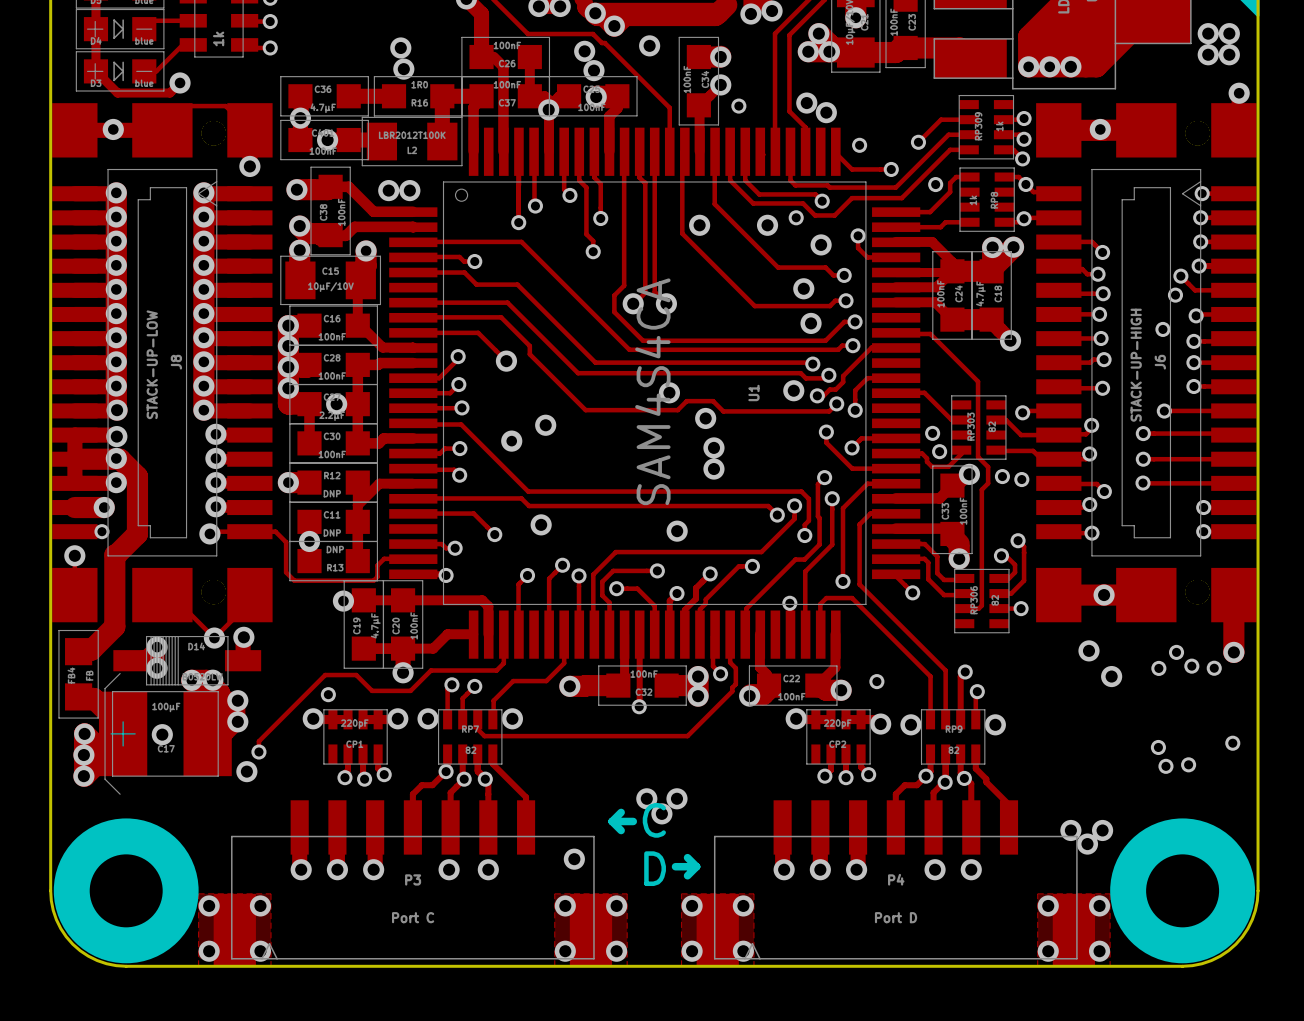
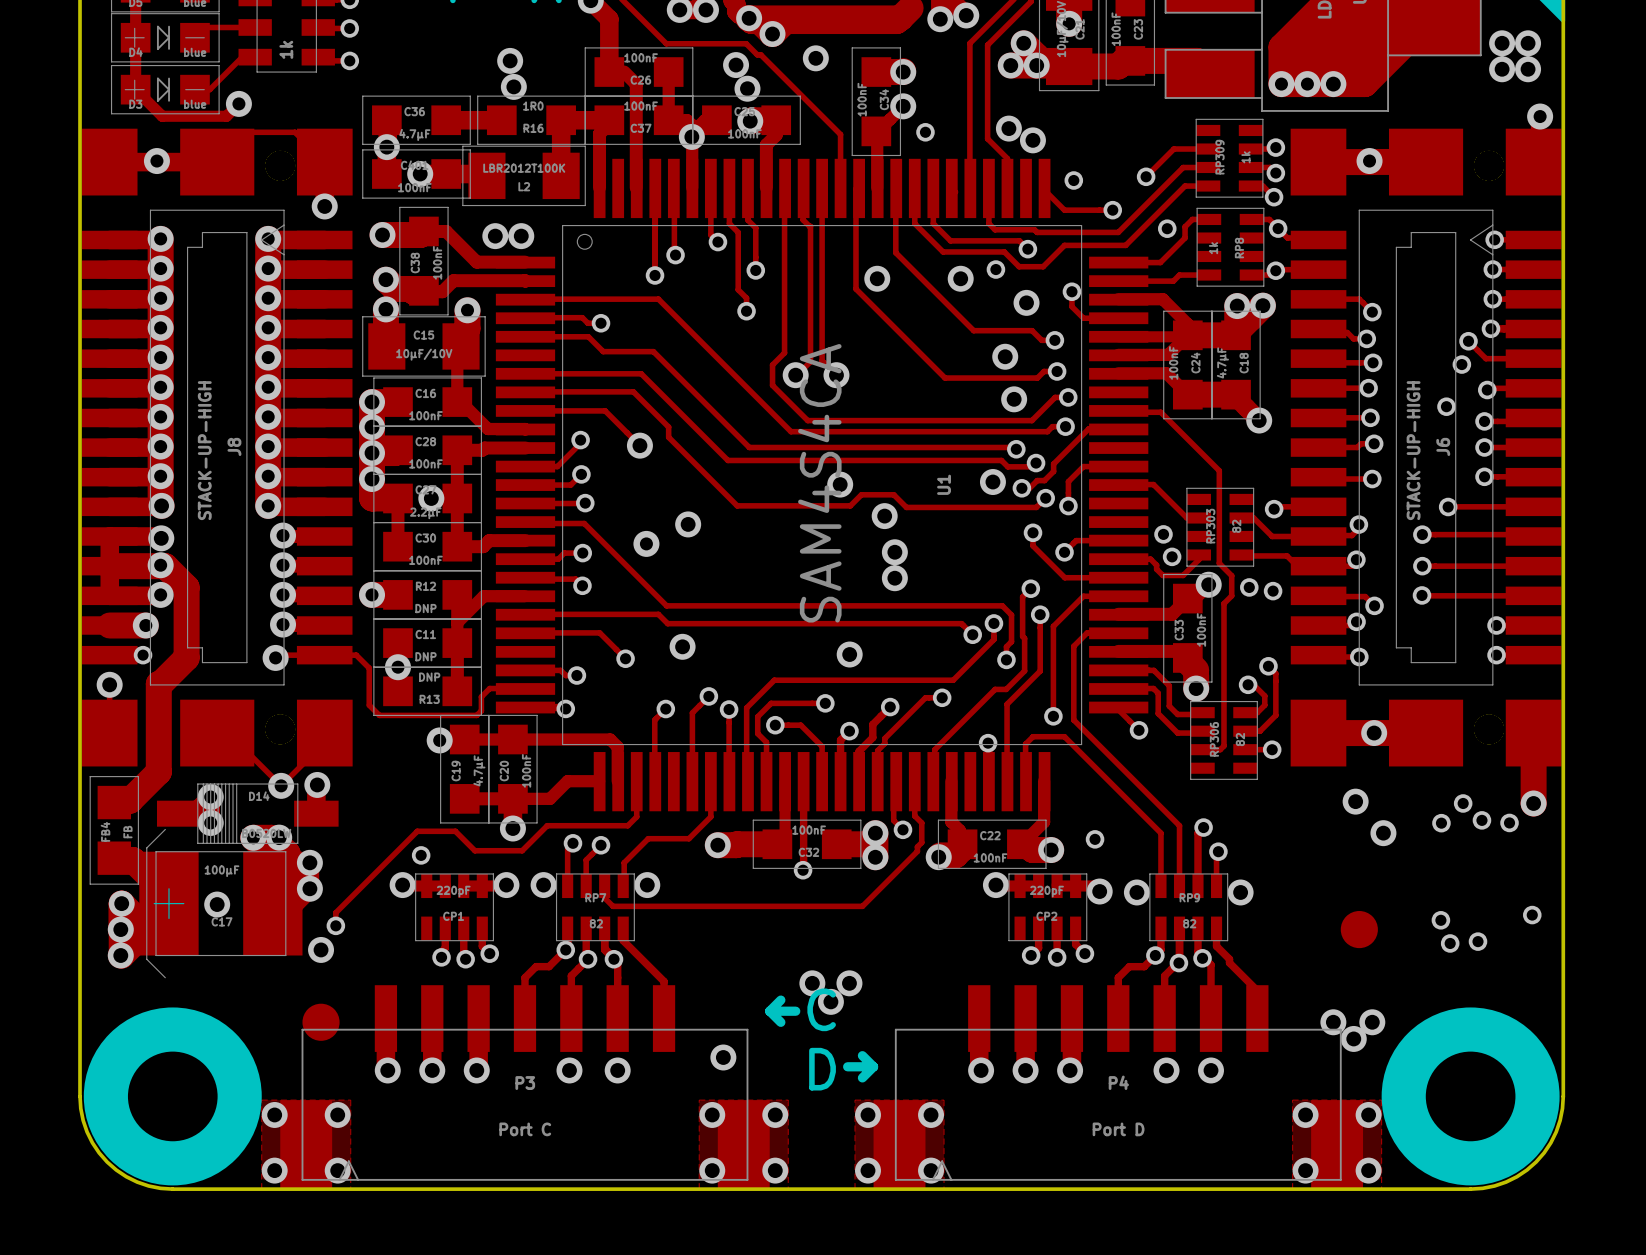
J8 value: STACK-UP-LOW (152, 364) -> STACK-UP-HIGH (204, 450)
part: none -> (1359, 929)
part: none -> (321, 1022)

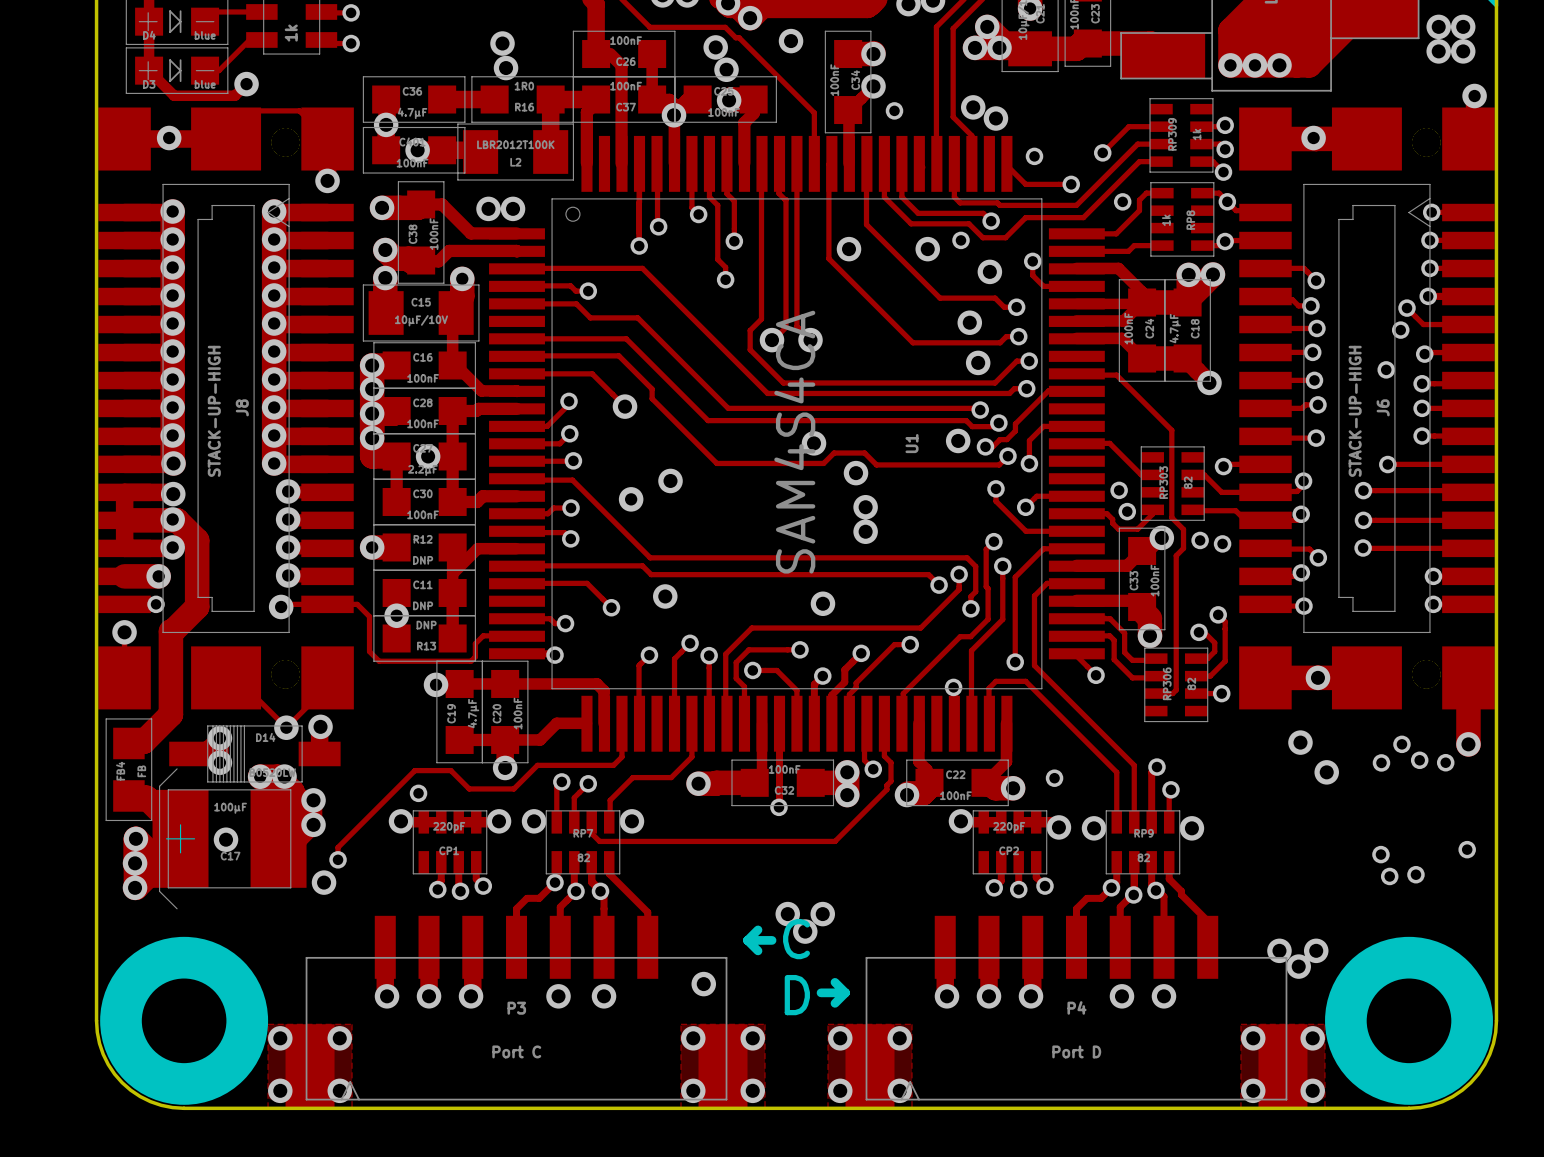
part: (1359, 929) -> none
part: (321, 1022) -> none

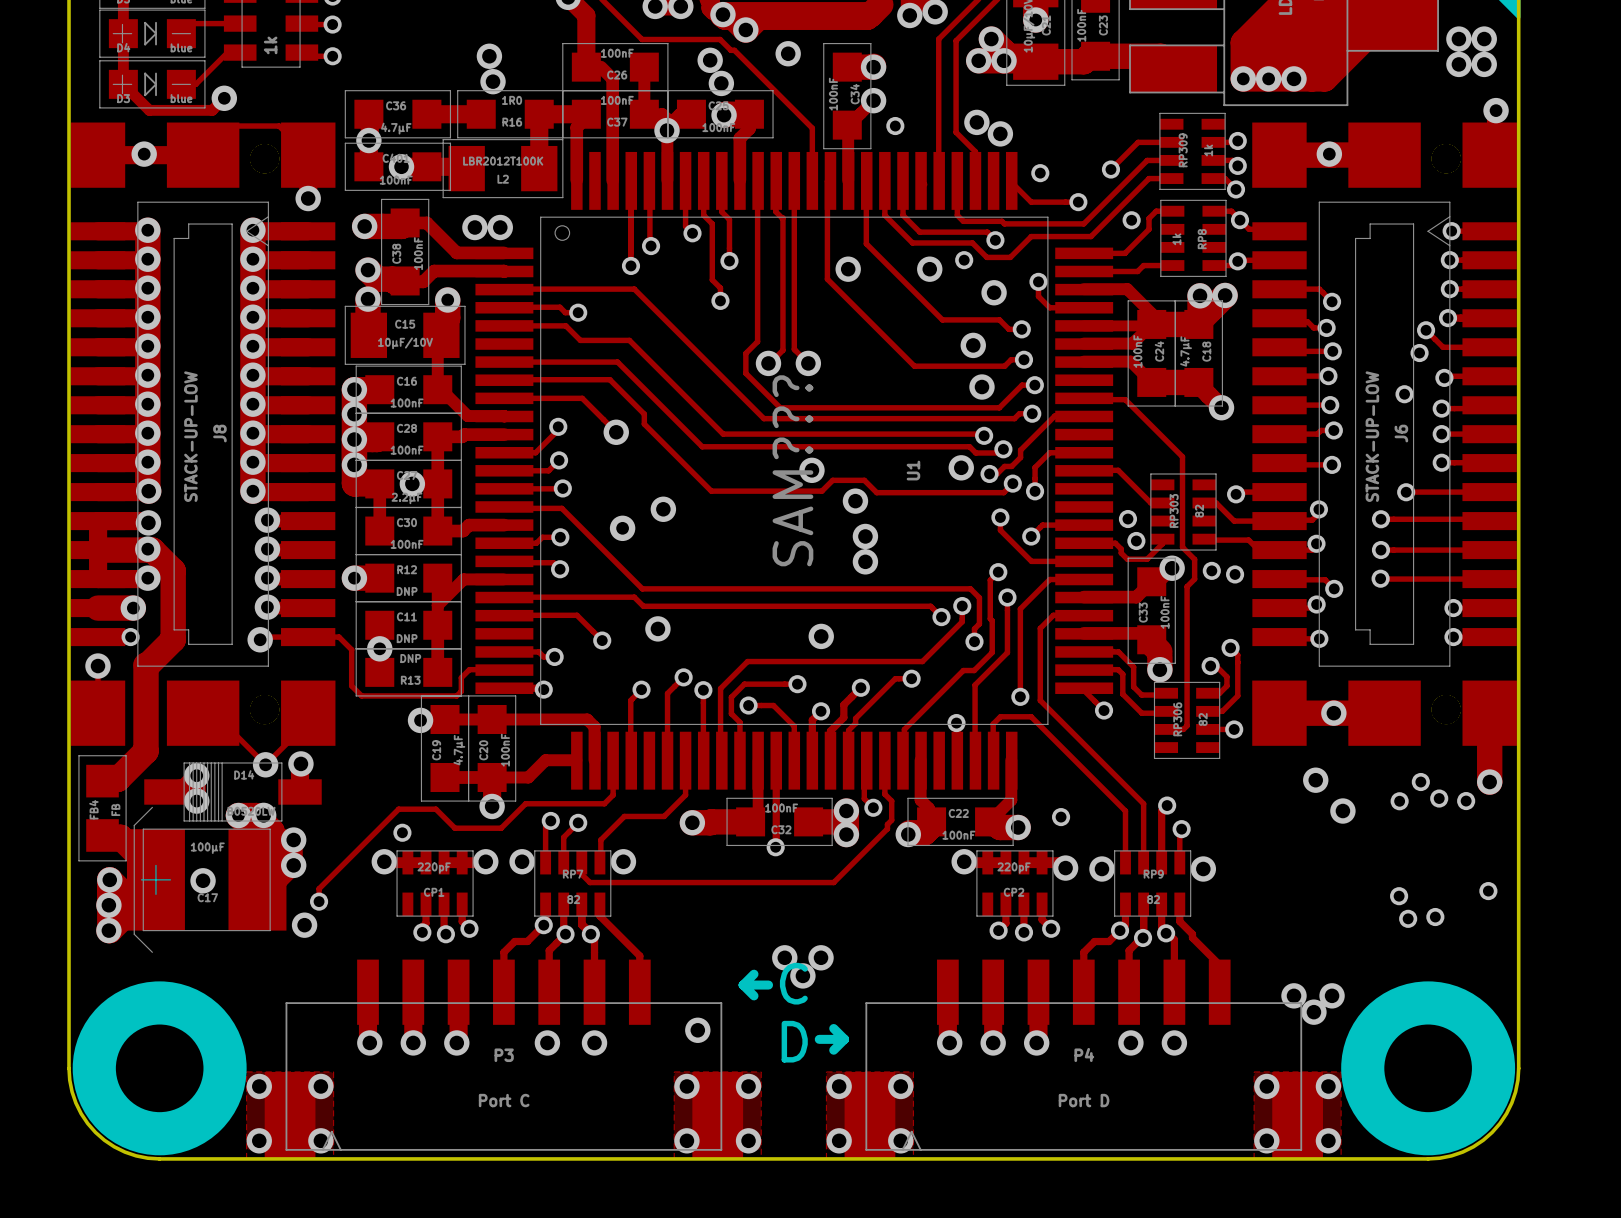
J8 value: STACK-UP-HIGH (214, 411) -> STACK-UP-LOW (190, 436)
J6 value: STACK-UP-HIGH (1355, 411) -> STACK-UP-LOW (1372, 436)
U1 value: SAM4S4CA (794, 442) -> SAM??? (792, 470)

